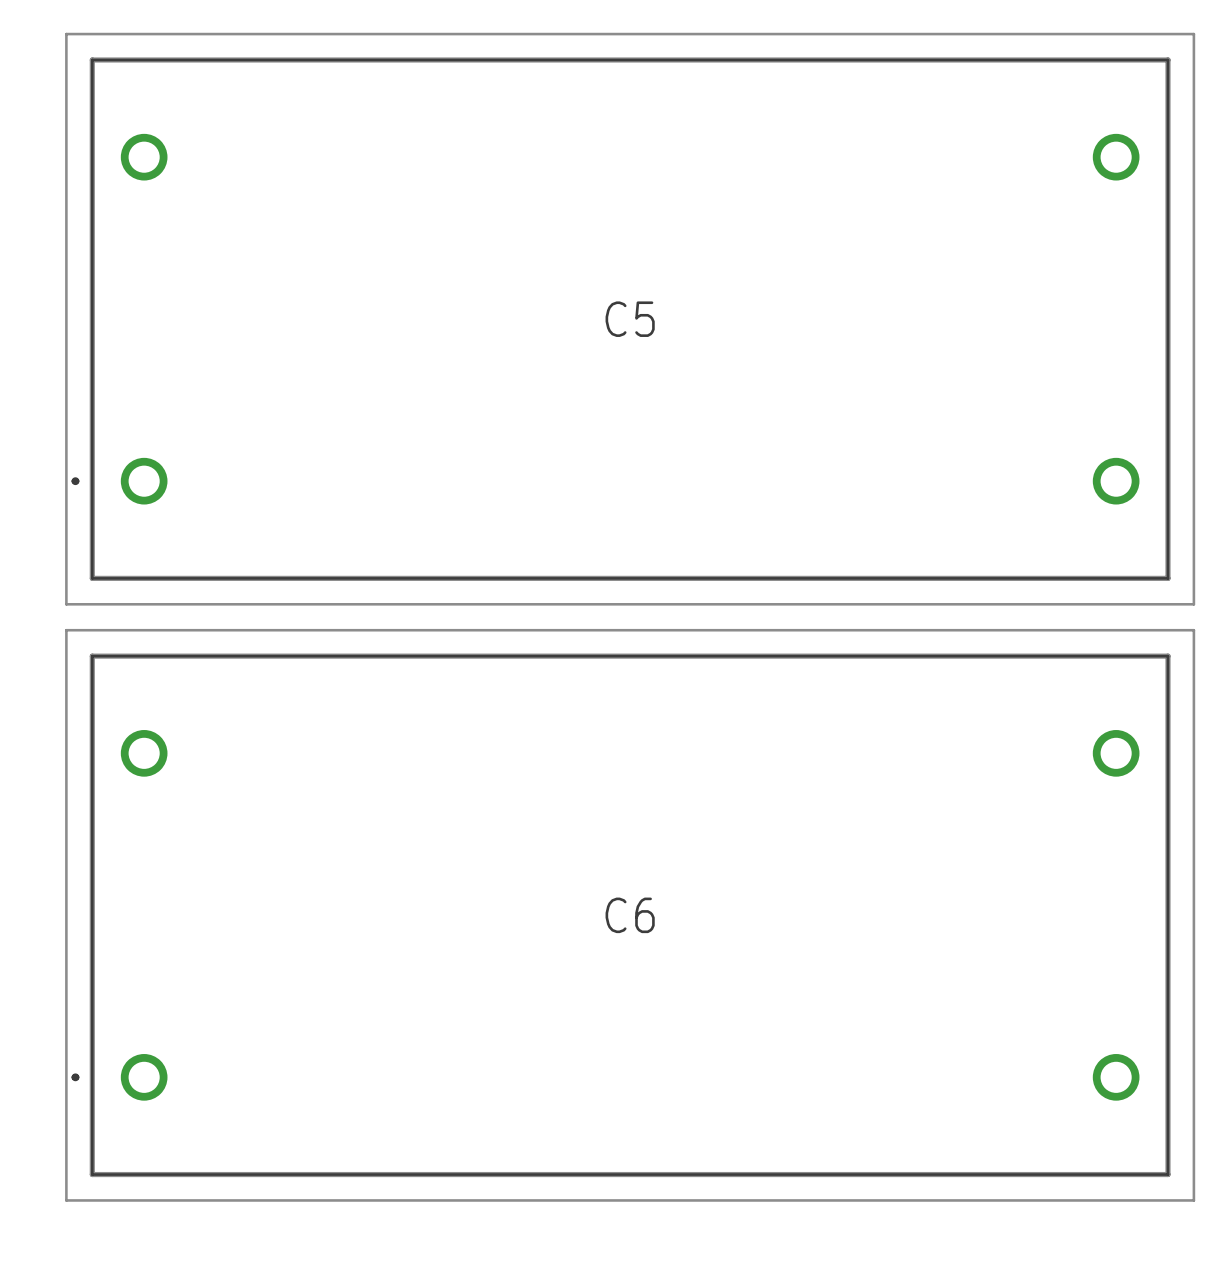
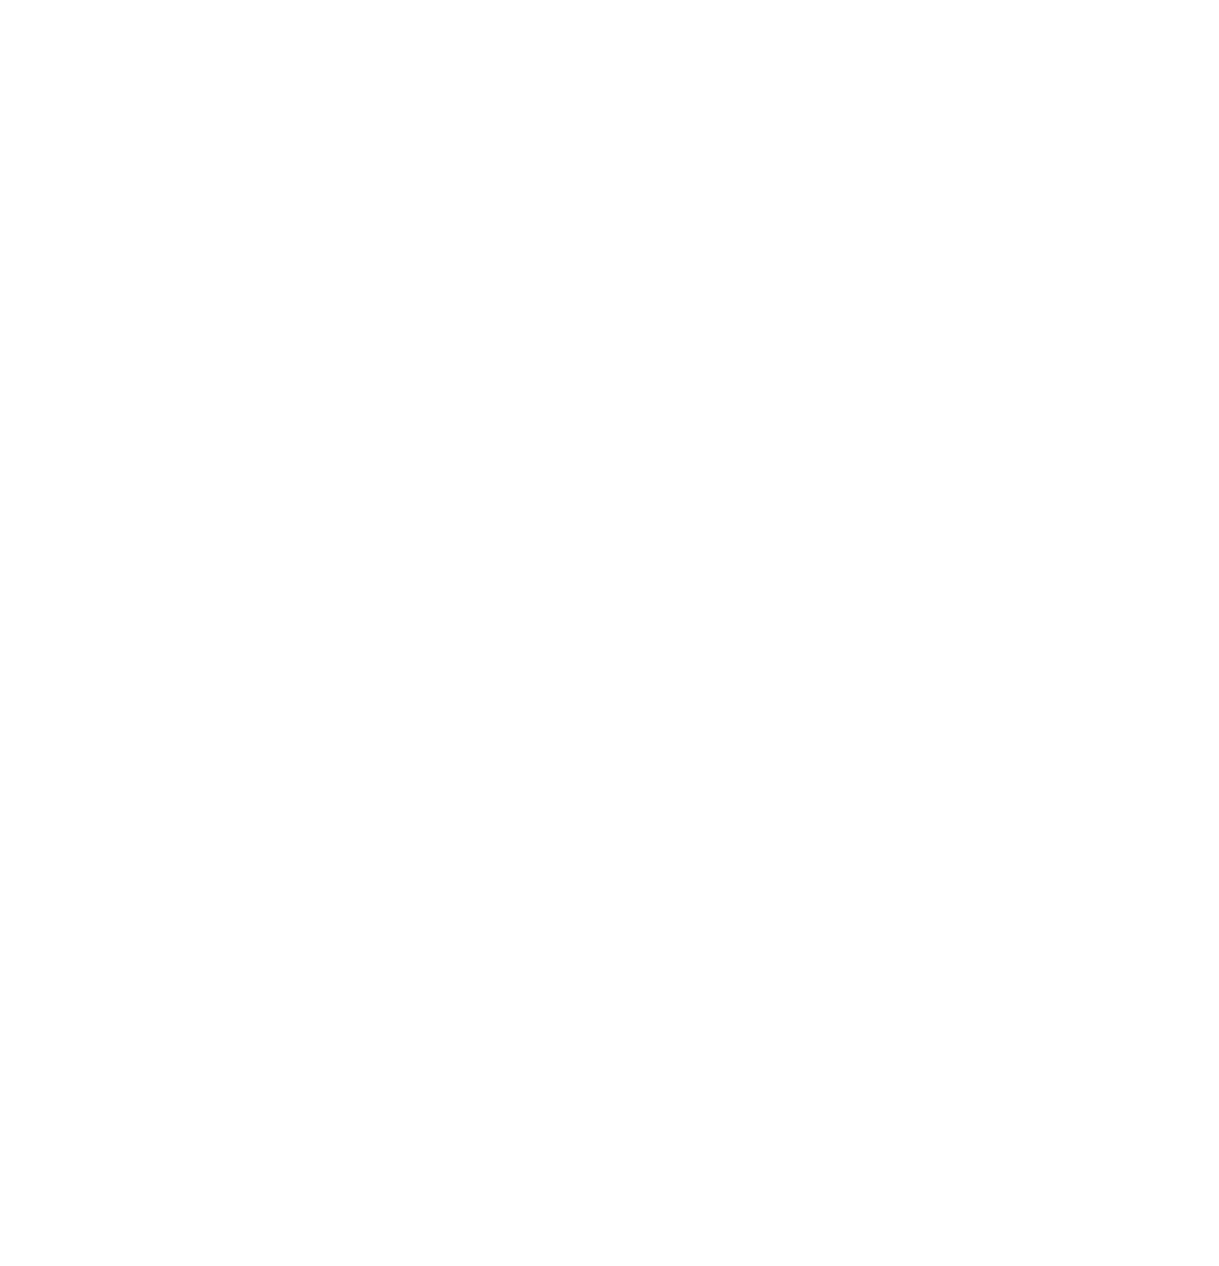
C5: (630, 319) -> none
C6: (630, 915) -> none

